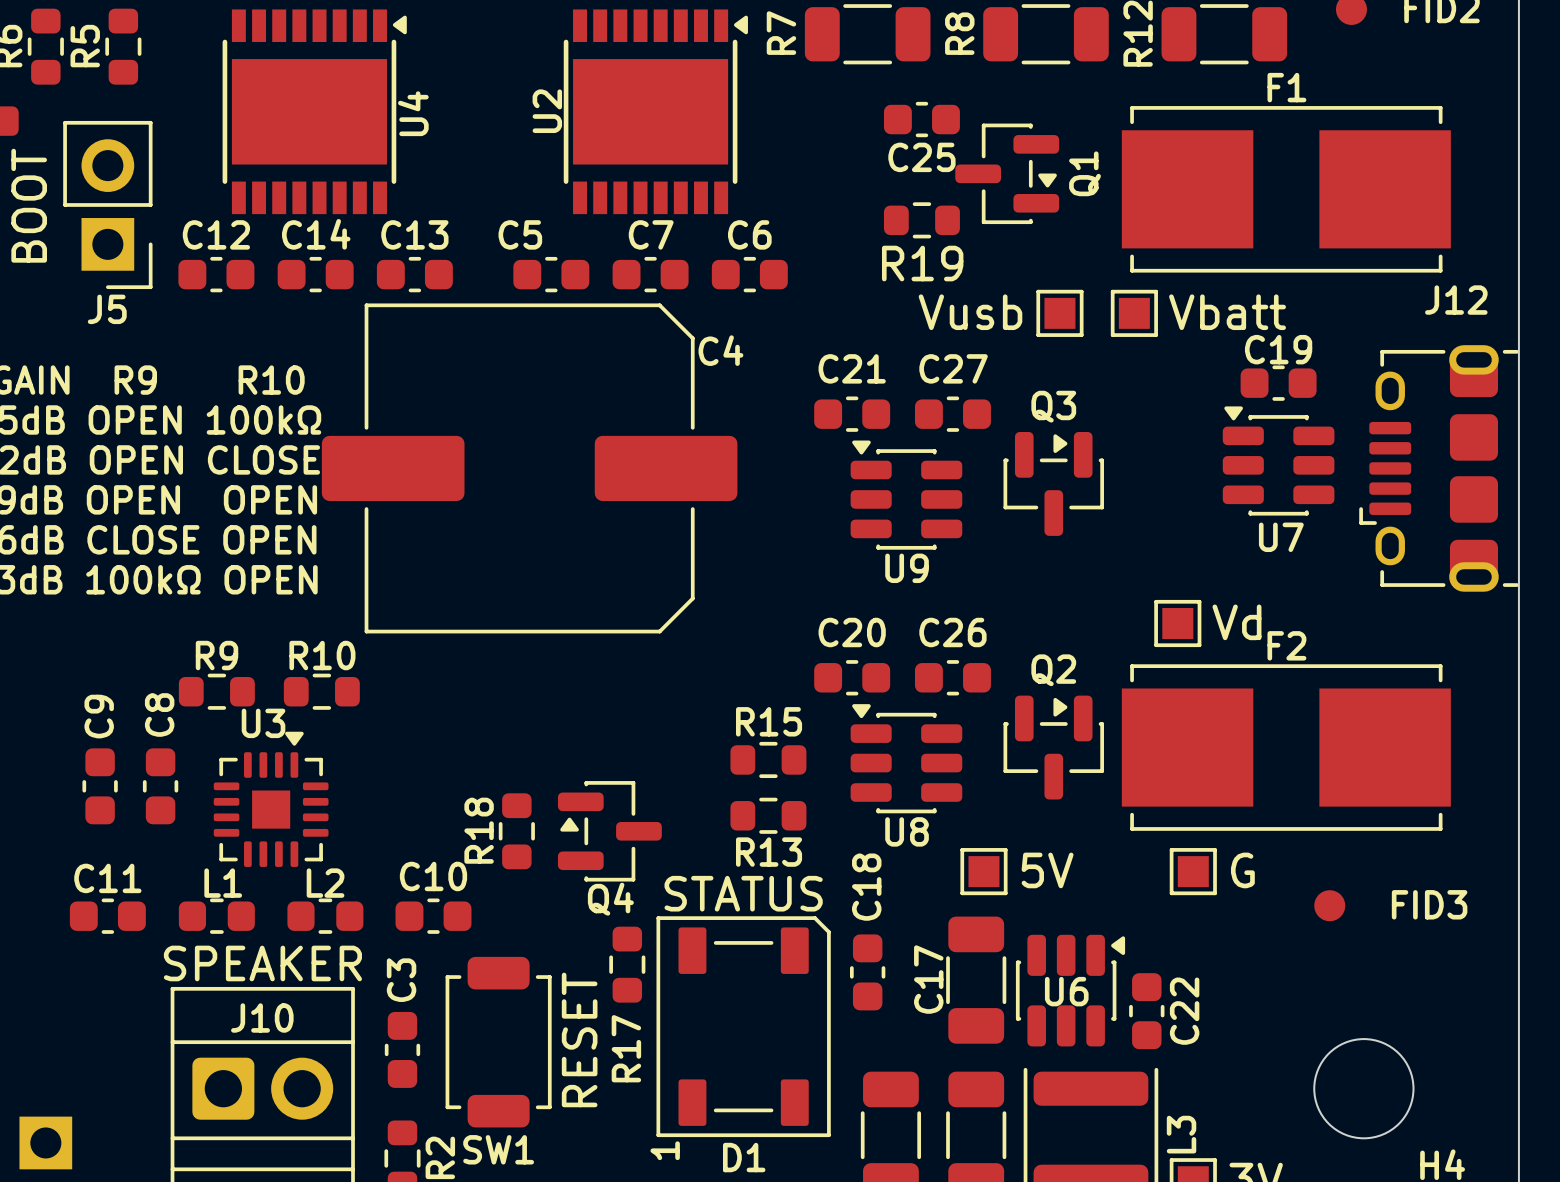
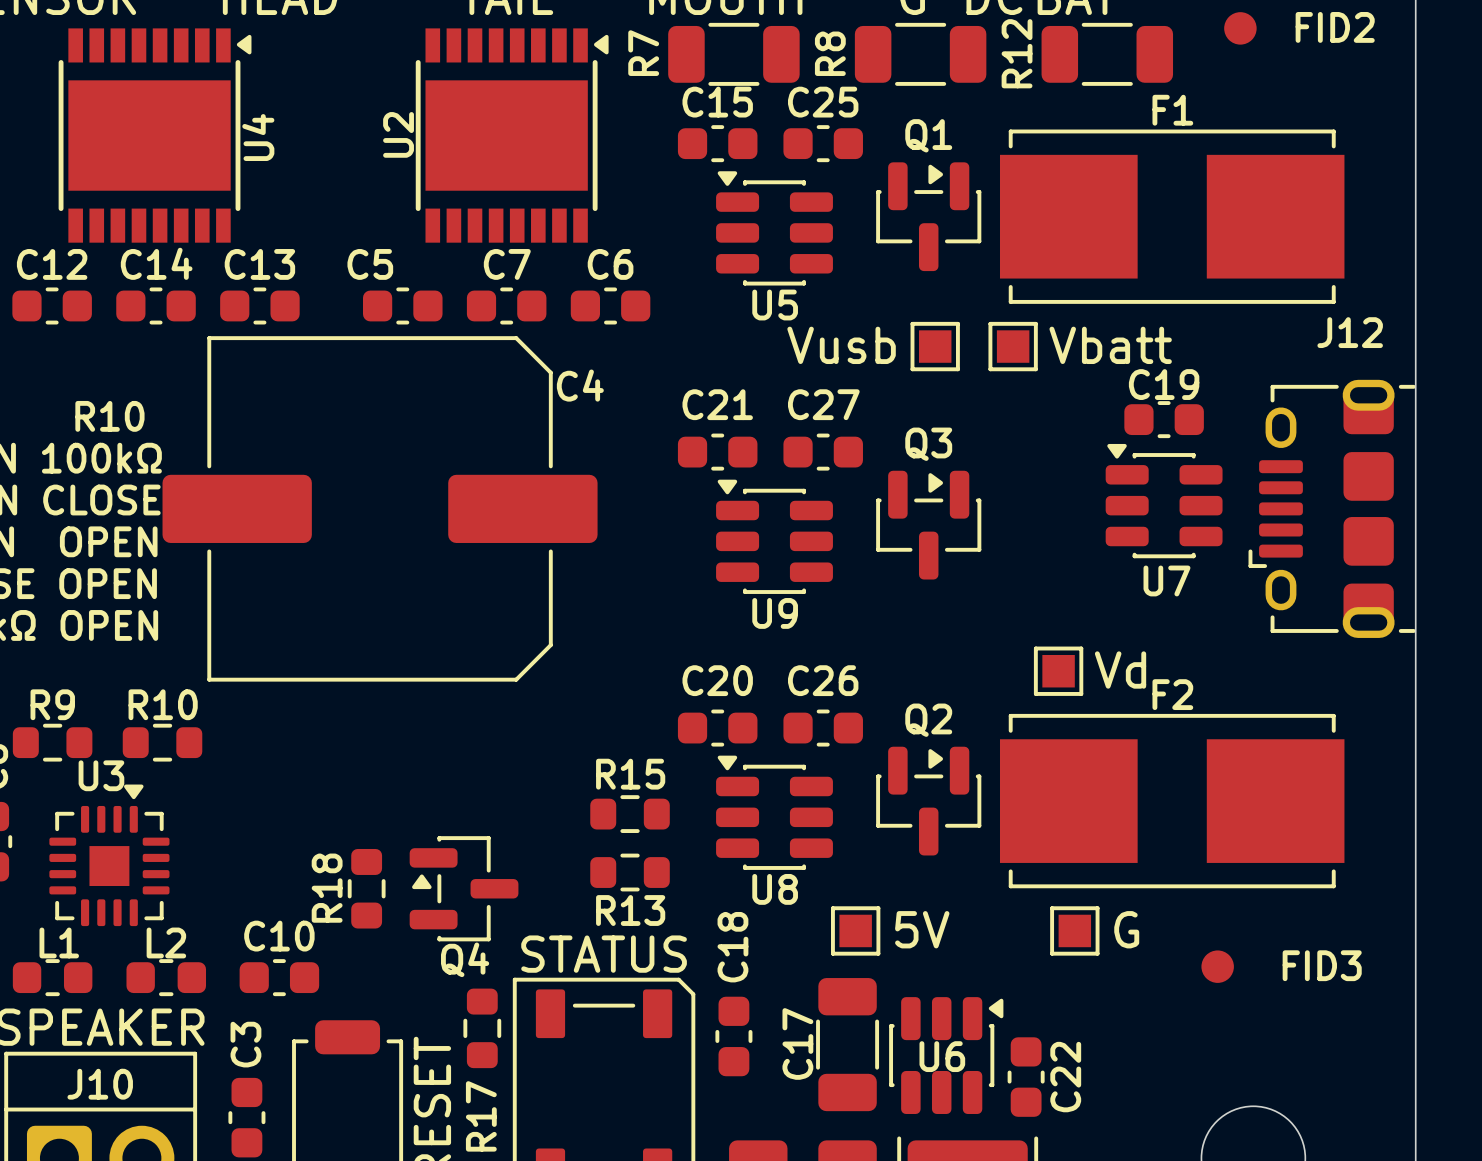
C15: none -> (717, 143)
C25 position: (921, 119) -> (823, 143)
C25 name position: C25 (921, 157) -> C25 (823, 102)
Q1 rotation: 0° (1007, 173) -> 90° counterclockwise (928, 216)
U5: none -> (774, 228)
R19: (921, 220) -> none

